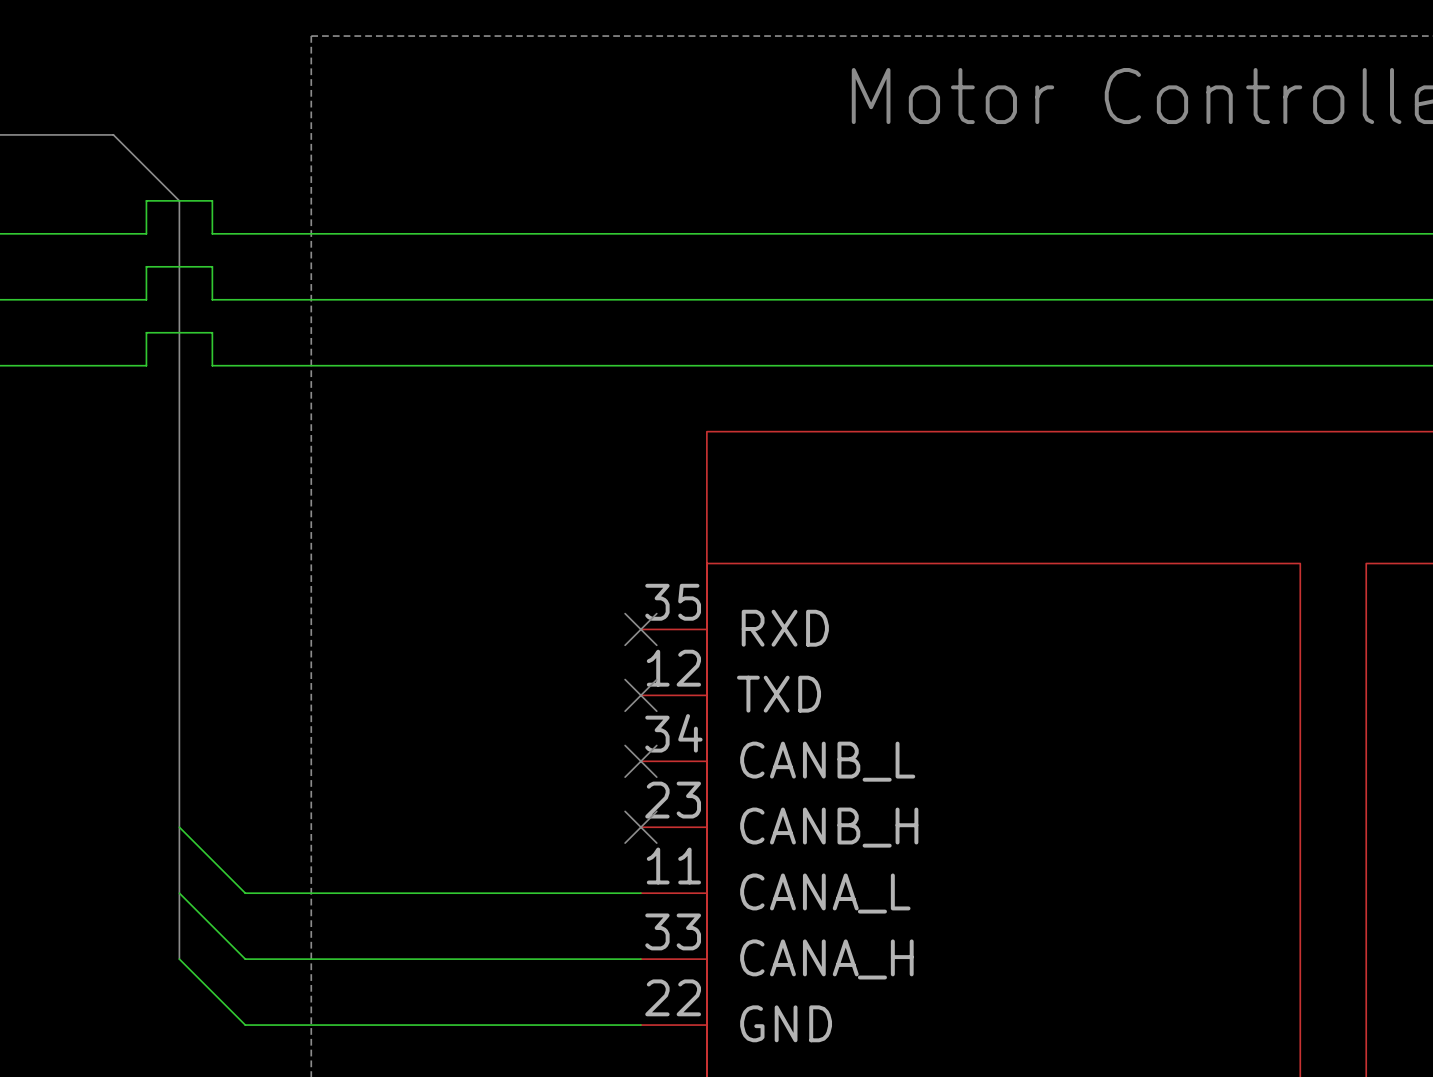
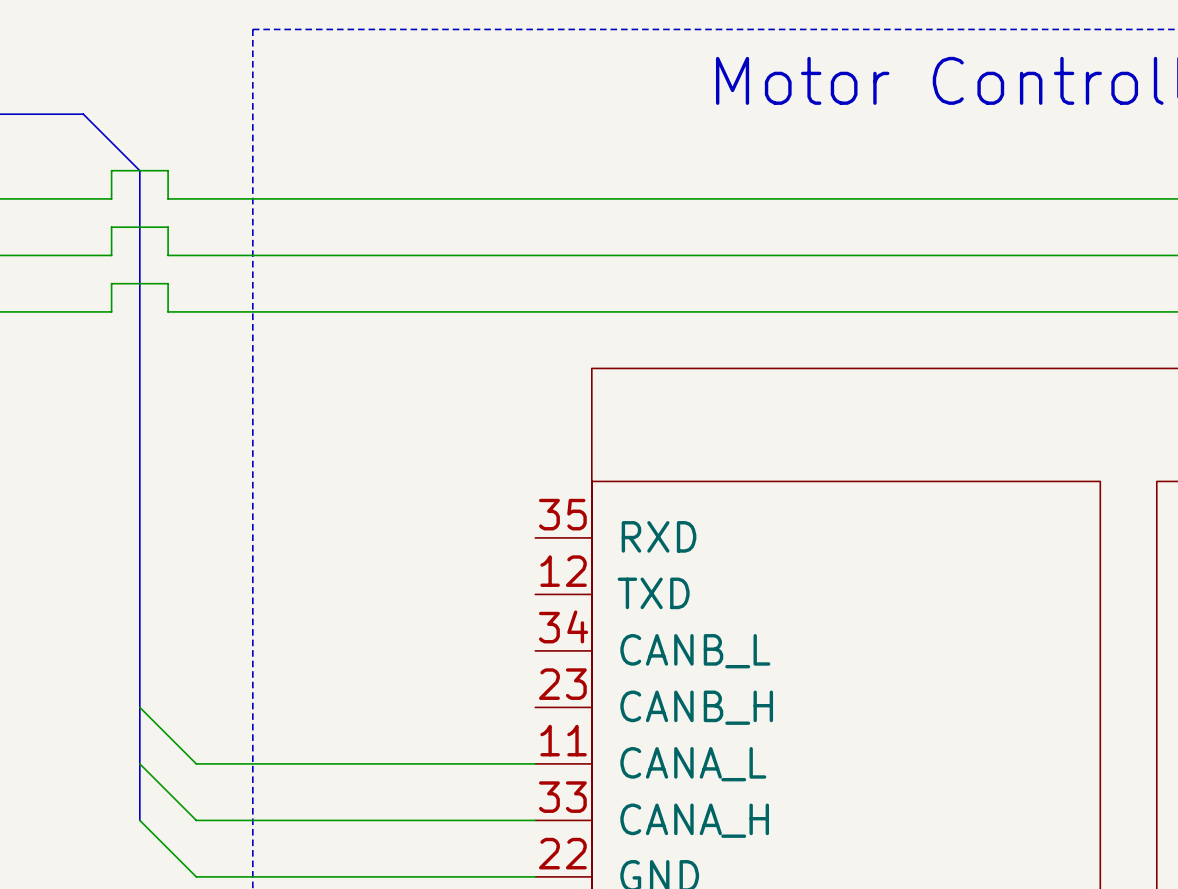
no-connect mark: (640, 629) -> none
no-connect mark: (640, 695) -> none
no-connect mark: (640, 761) -> none
no-connect mark: (640, 827) -> none

